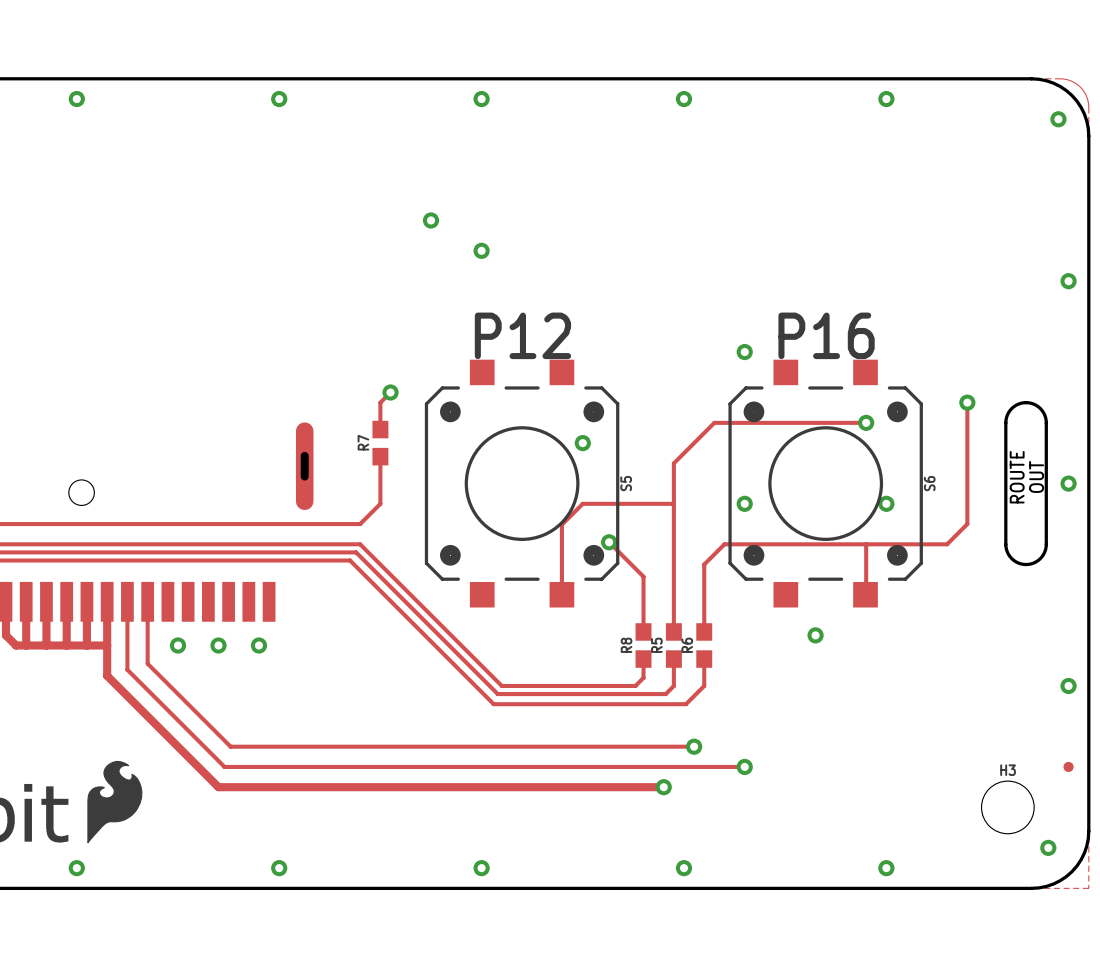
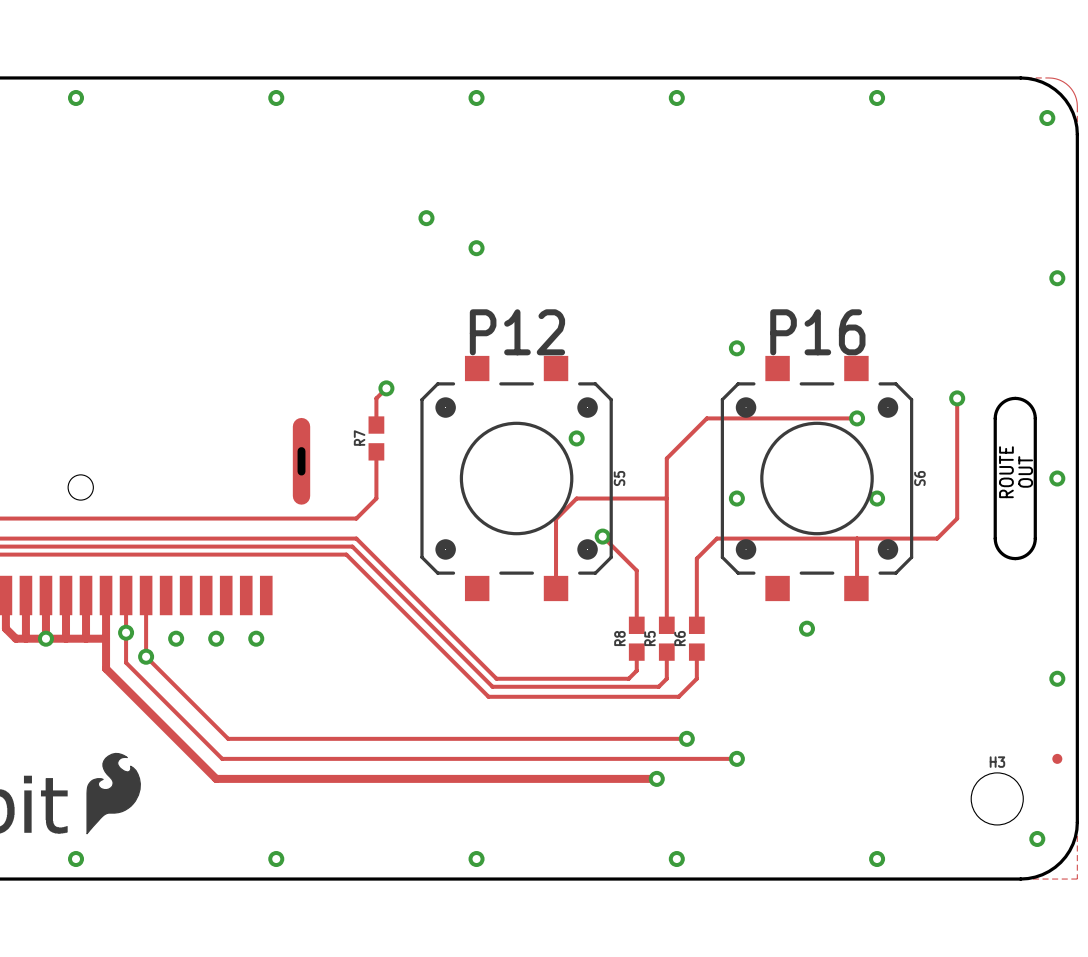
via: none -> (126, 632)
via: none -> (45, 638)
via: none -> (146, 656)

